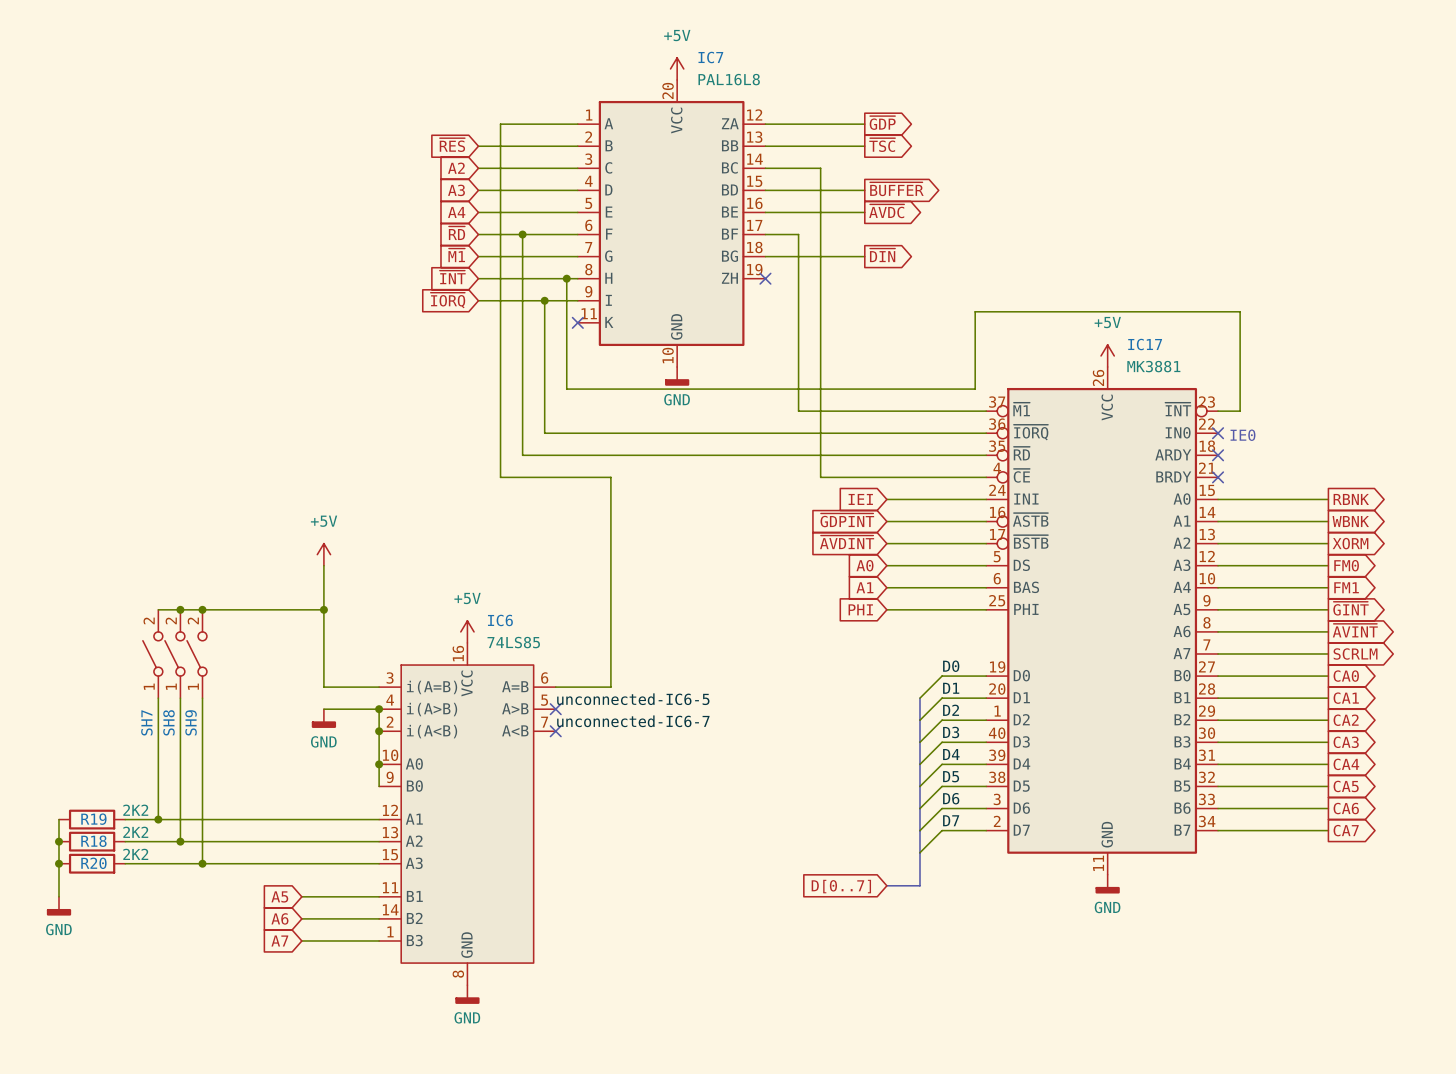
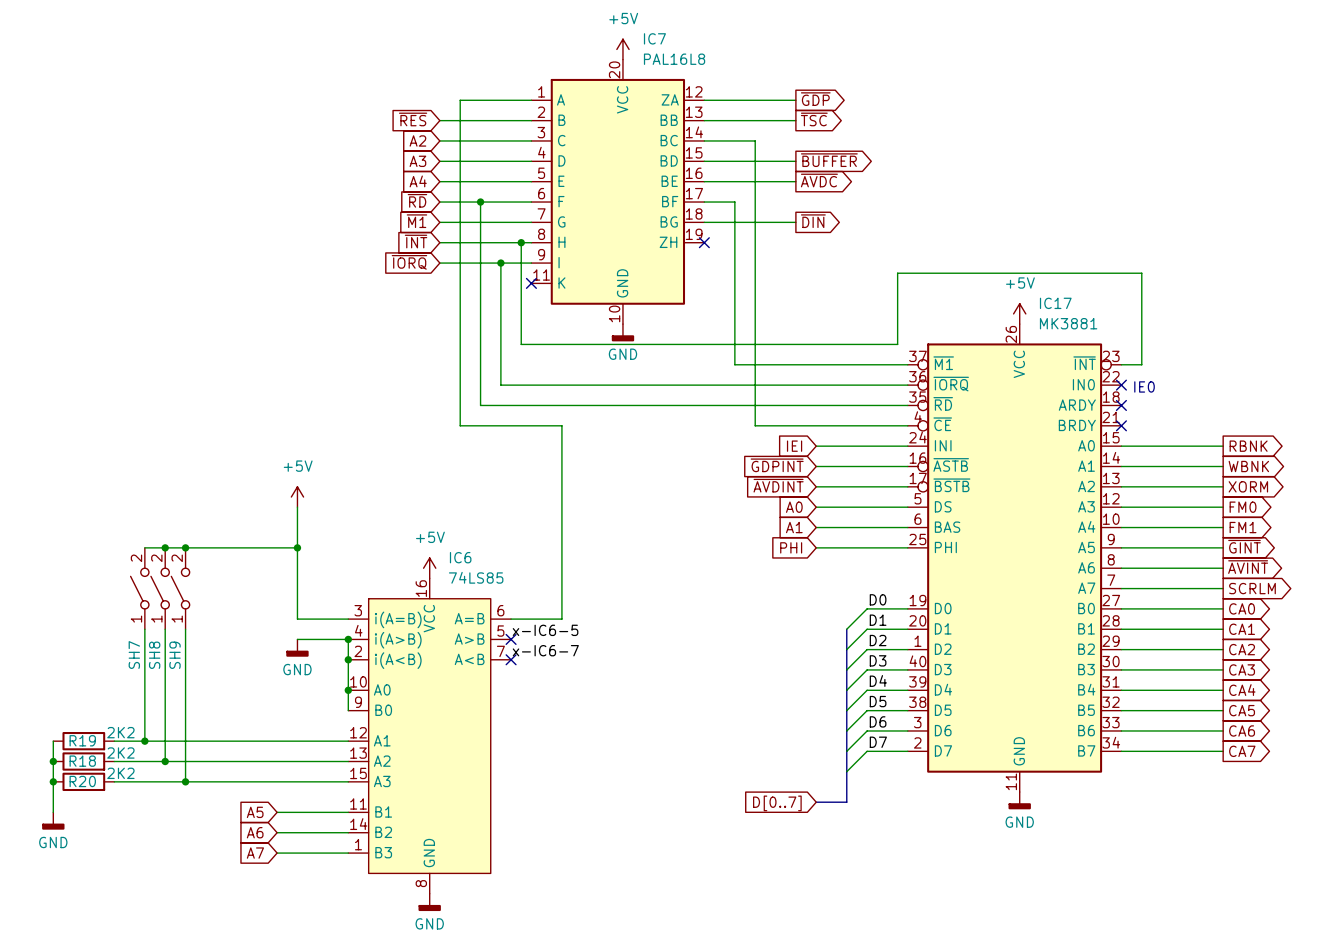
label: unconnected-IC6-5 (633, 699) -> x-IC6-5 (545, 630)
label: unconnected-IC6-7 (633, 721) -> x-IC6-7 (545, 650)

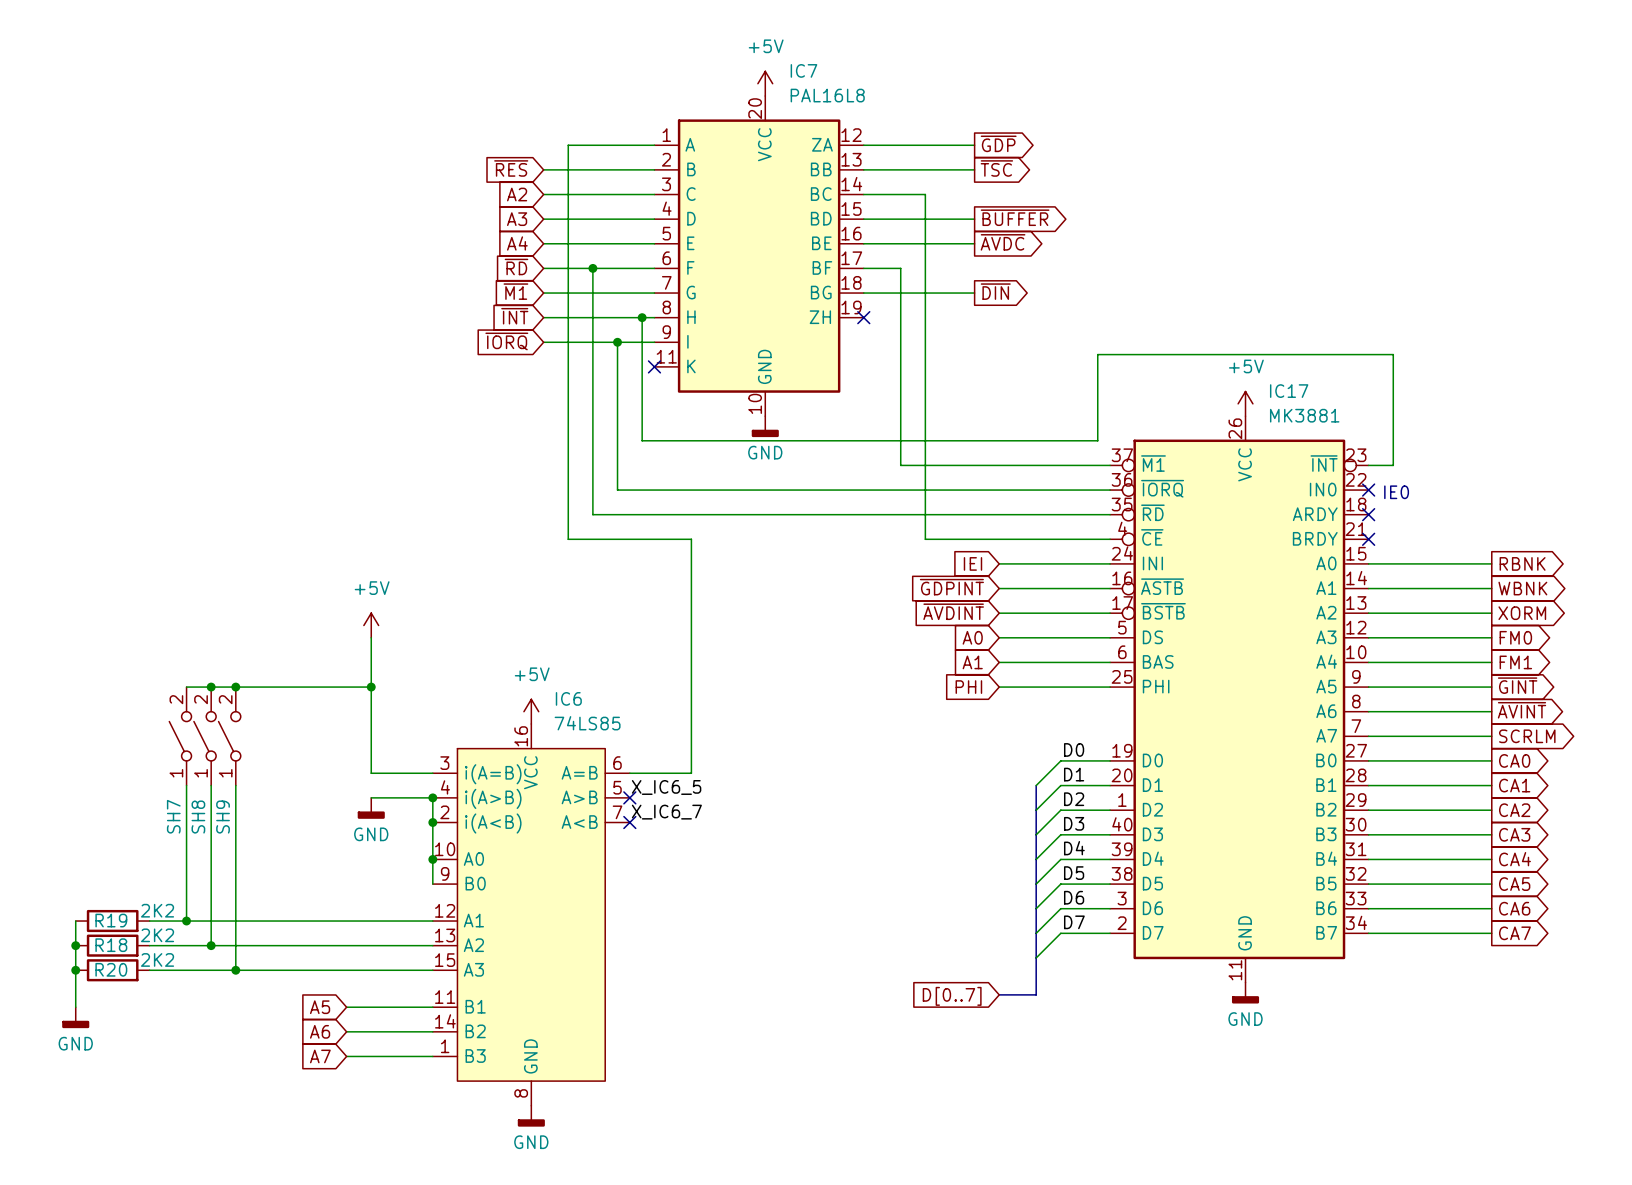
label: x-IC6-5 (545, 630) -> X_IC6_5 (666, 787)
label: x-IC6-7 (545, 650) -> X_IC6_7 (666, 812)

